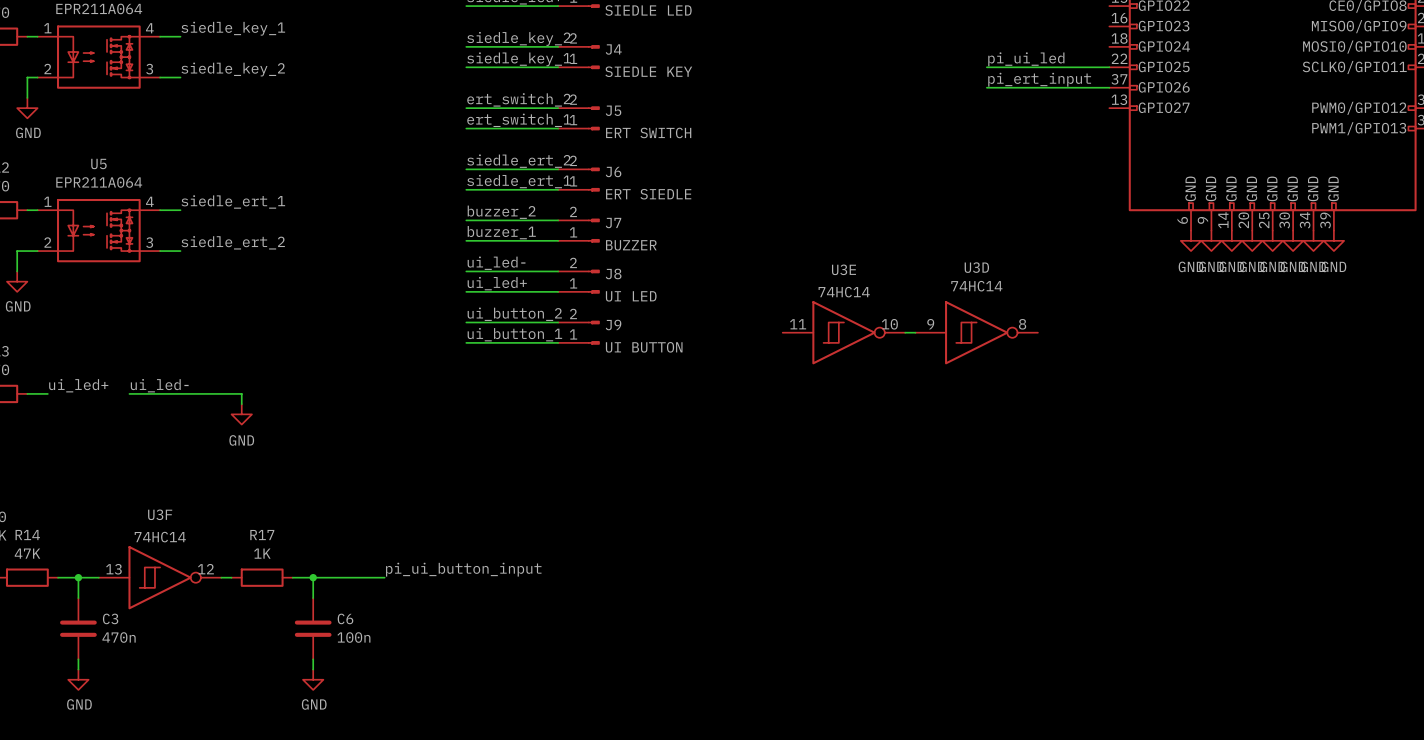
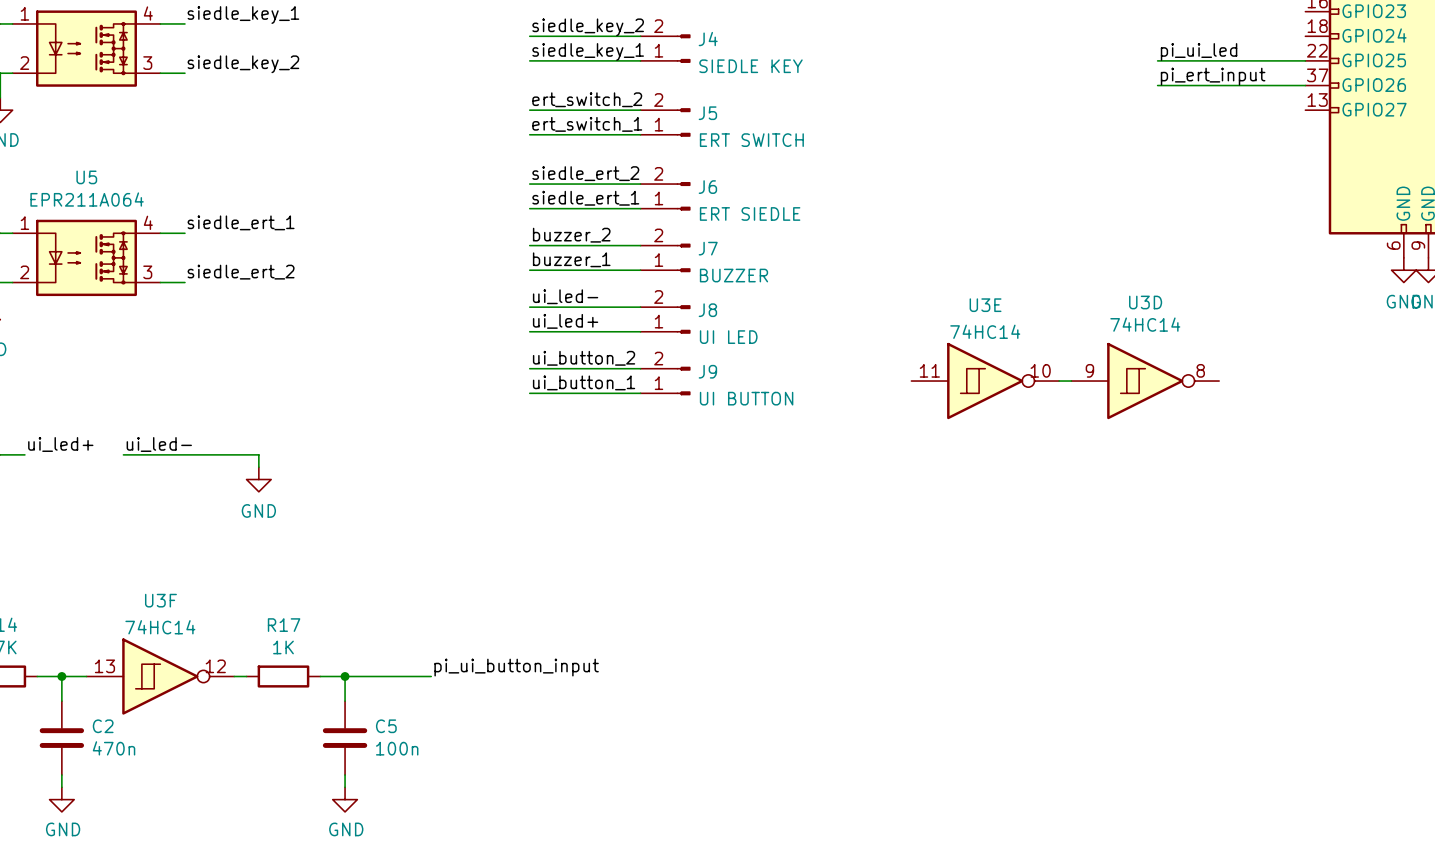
C3 name: C3 (110, 618) -> C2 (103, 726)
C6 name: C6 (345, 618) -> C5 (386, 726)

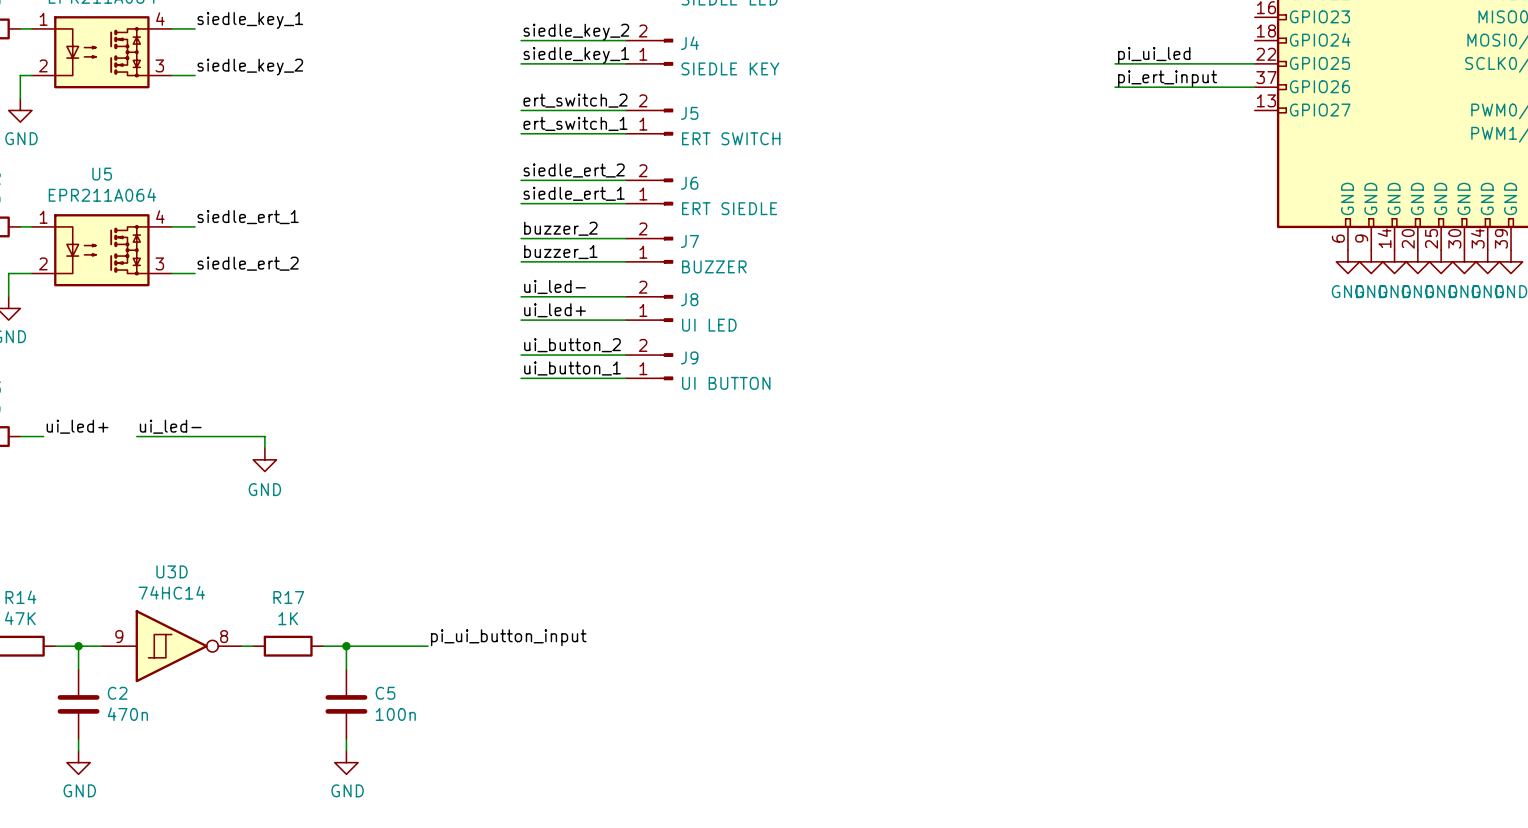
U3E: 74HC14 (985, 381) -> none
wire: (1059, 381) (1071, 381) -> none
U3D position: (1145, 381) -> (171, 646)
U3F: 74HC14 (160, 676) -> none

